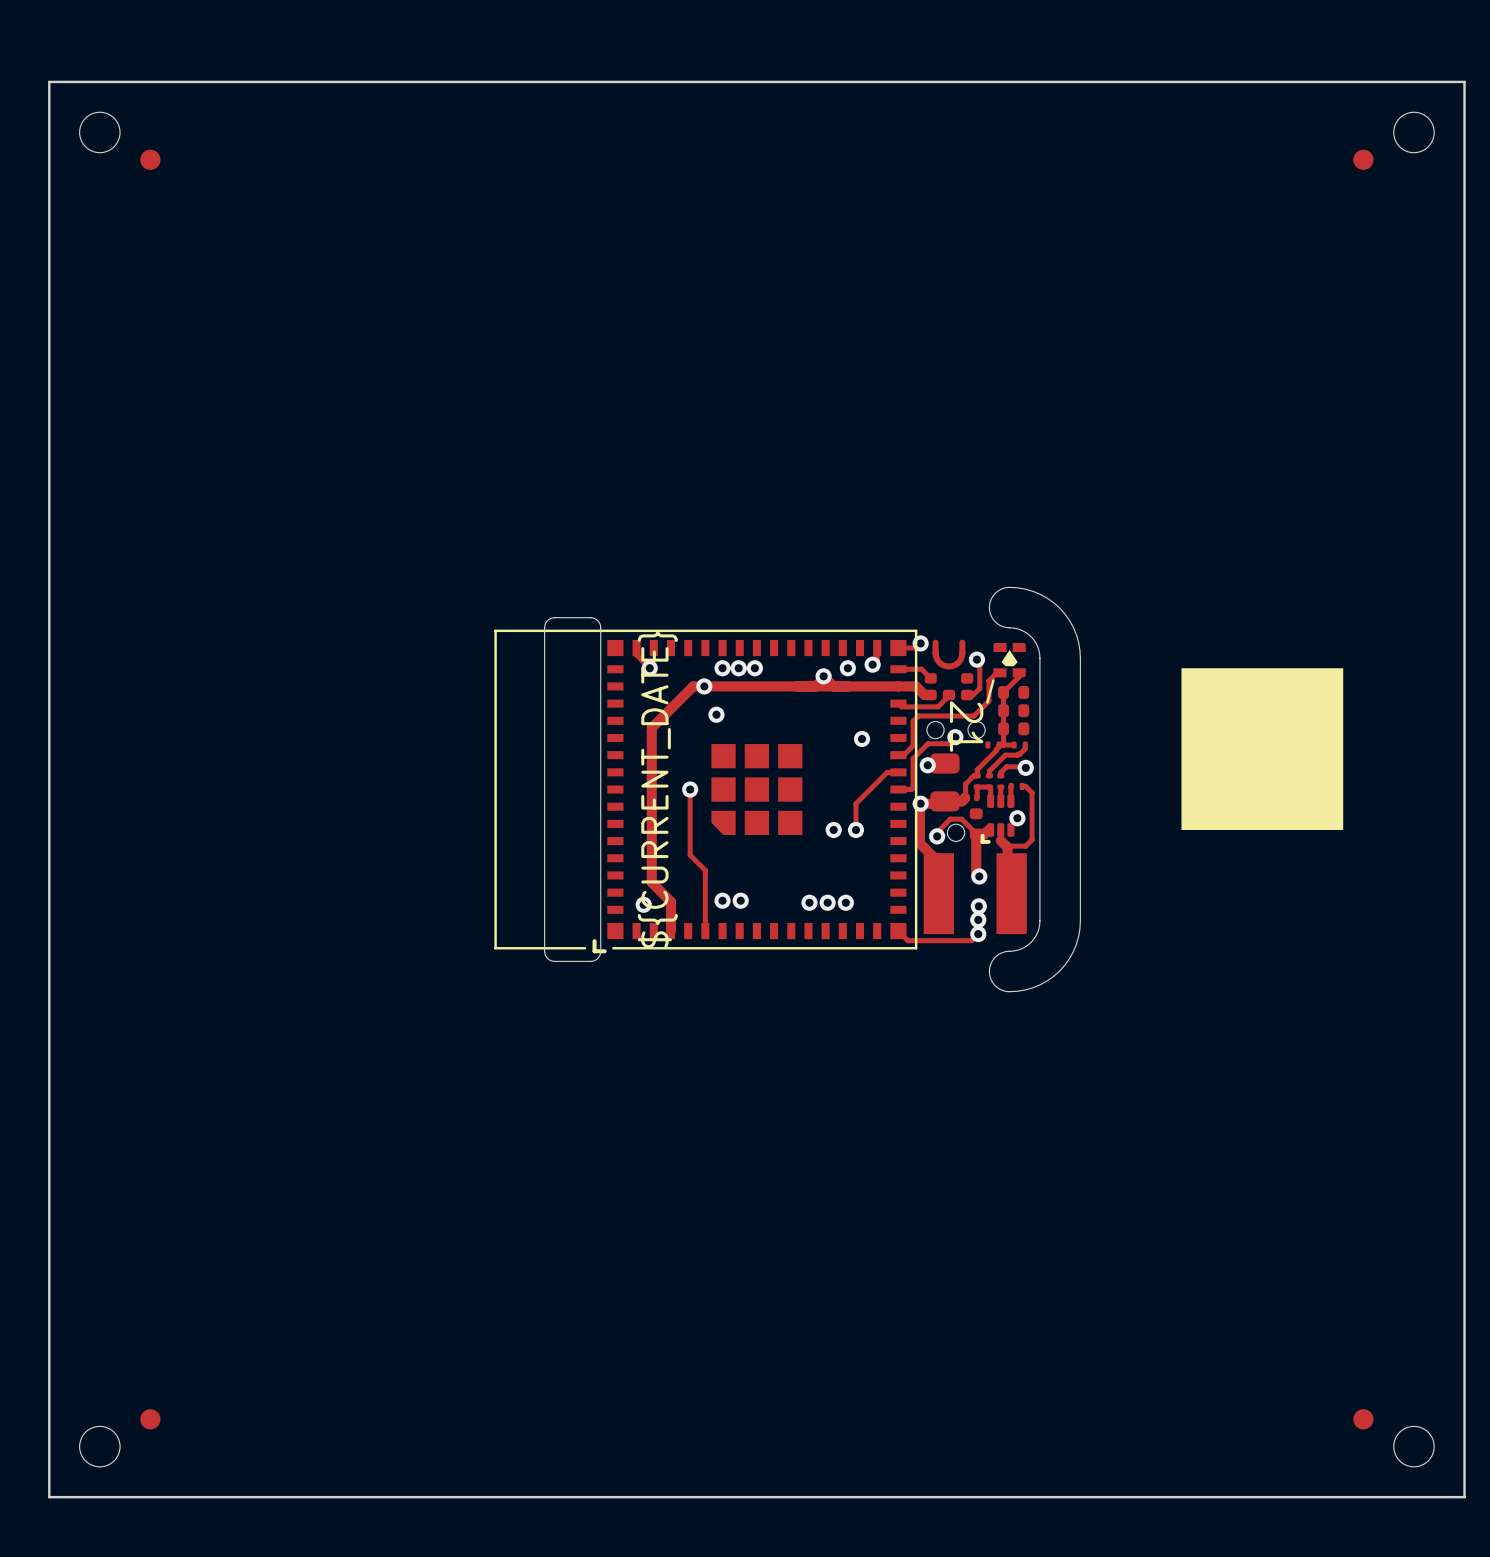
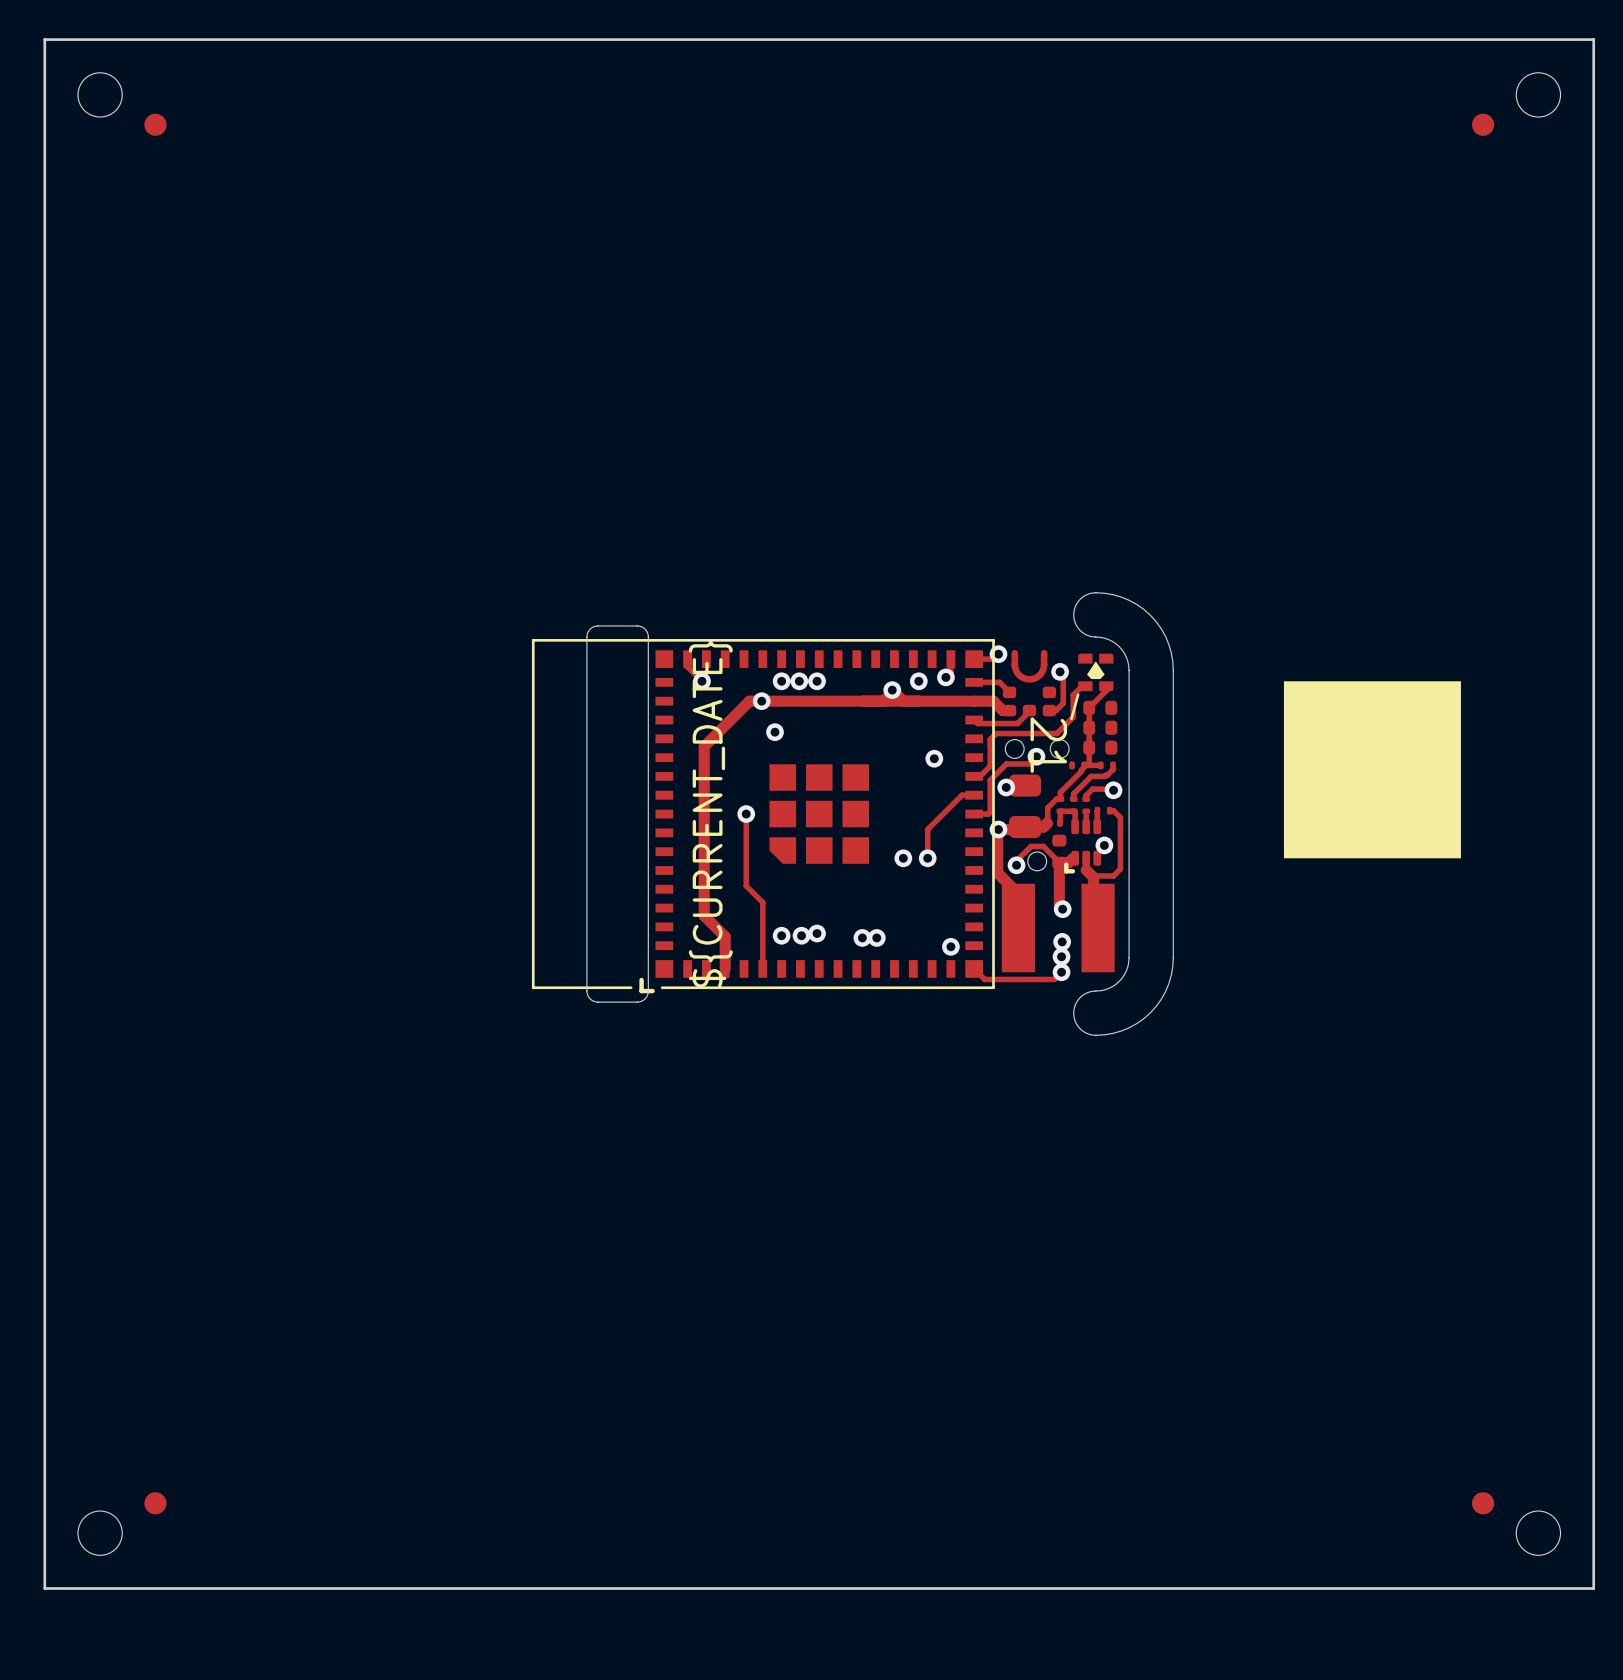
via: none -> (817, 933)
via: none -> (862, 937)
via: (827, 902) -> none
via: (845, 902) -> none
via: (643, 904) -> none
via: none -> (950, 946)

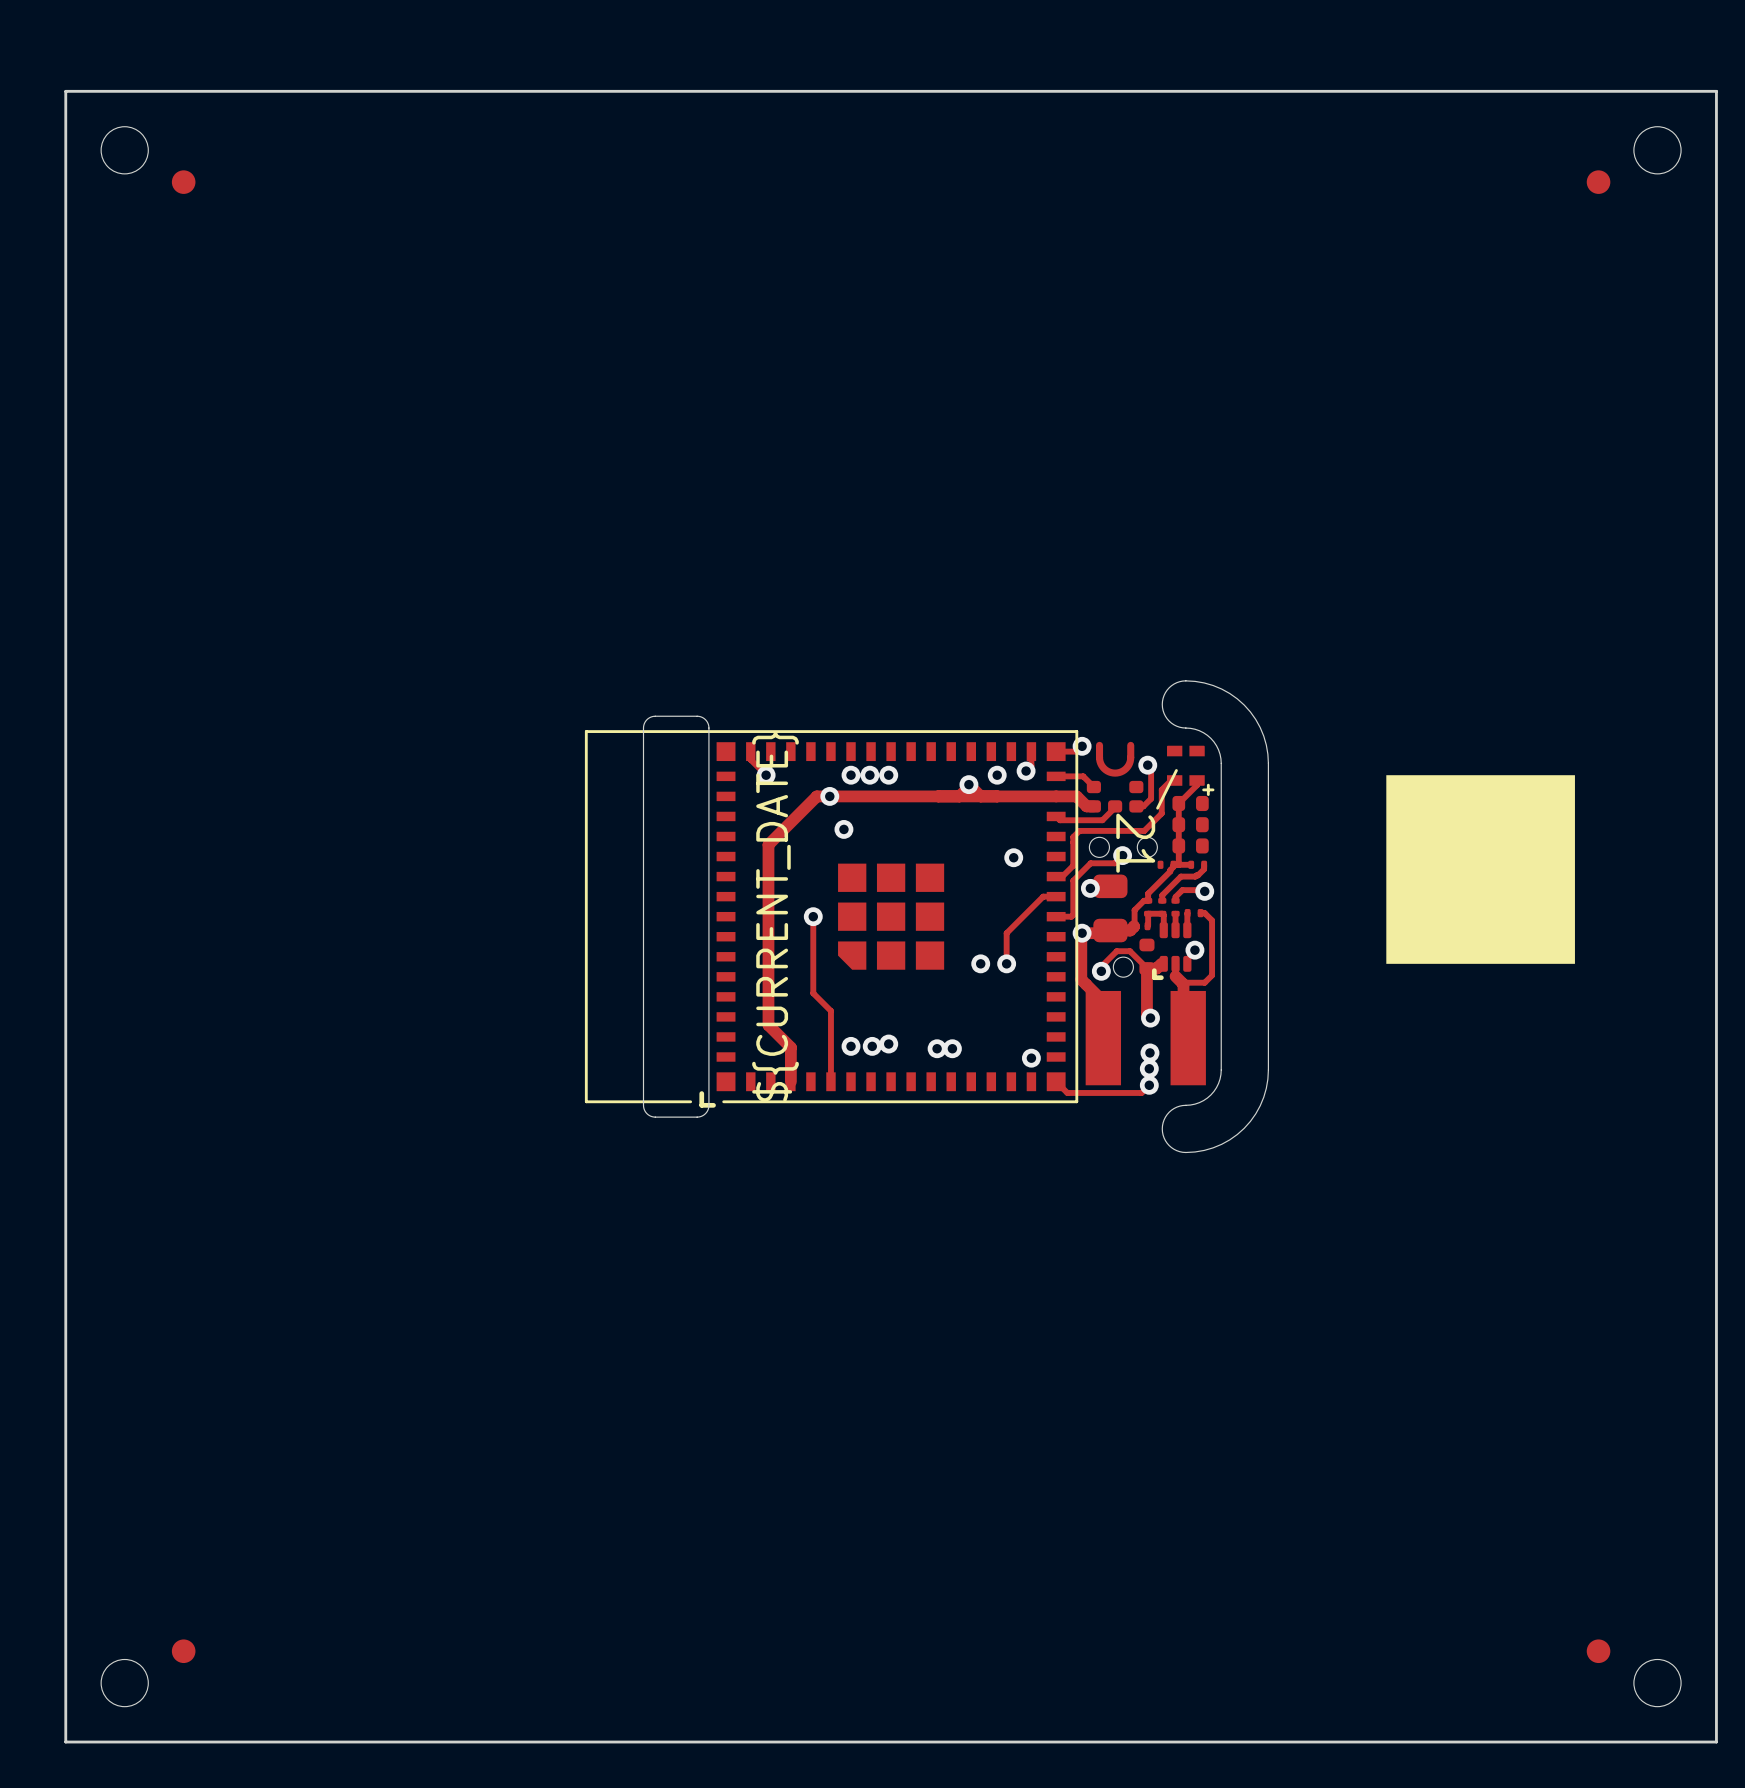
part footprint: [1078, 653, 1114, 692] -> [1167, 745, 1215, 797]
line: none -> (1176, 770) (1157, 808)
line: (1078, 694) (1071, 718) -> none

